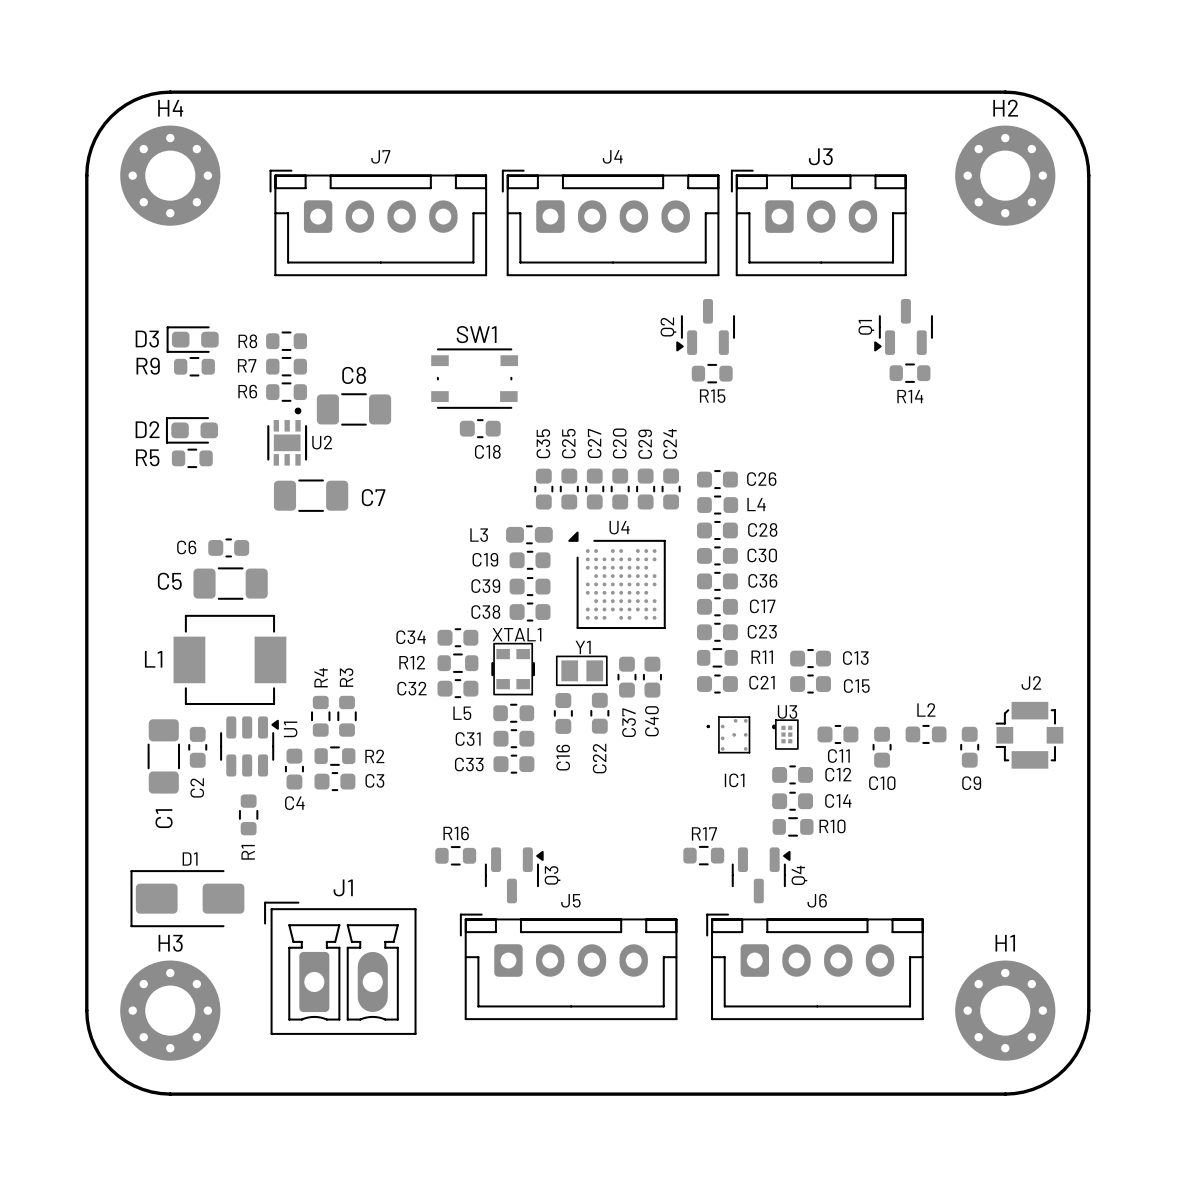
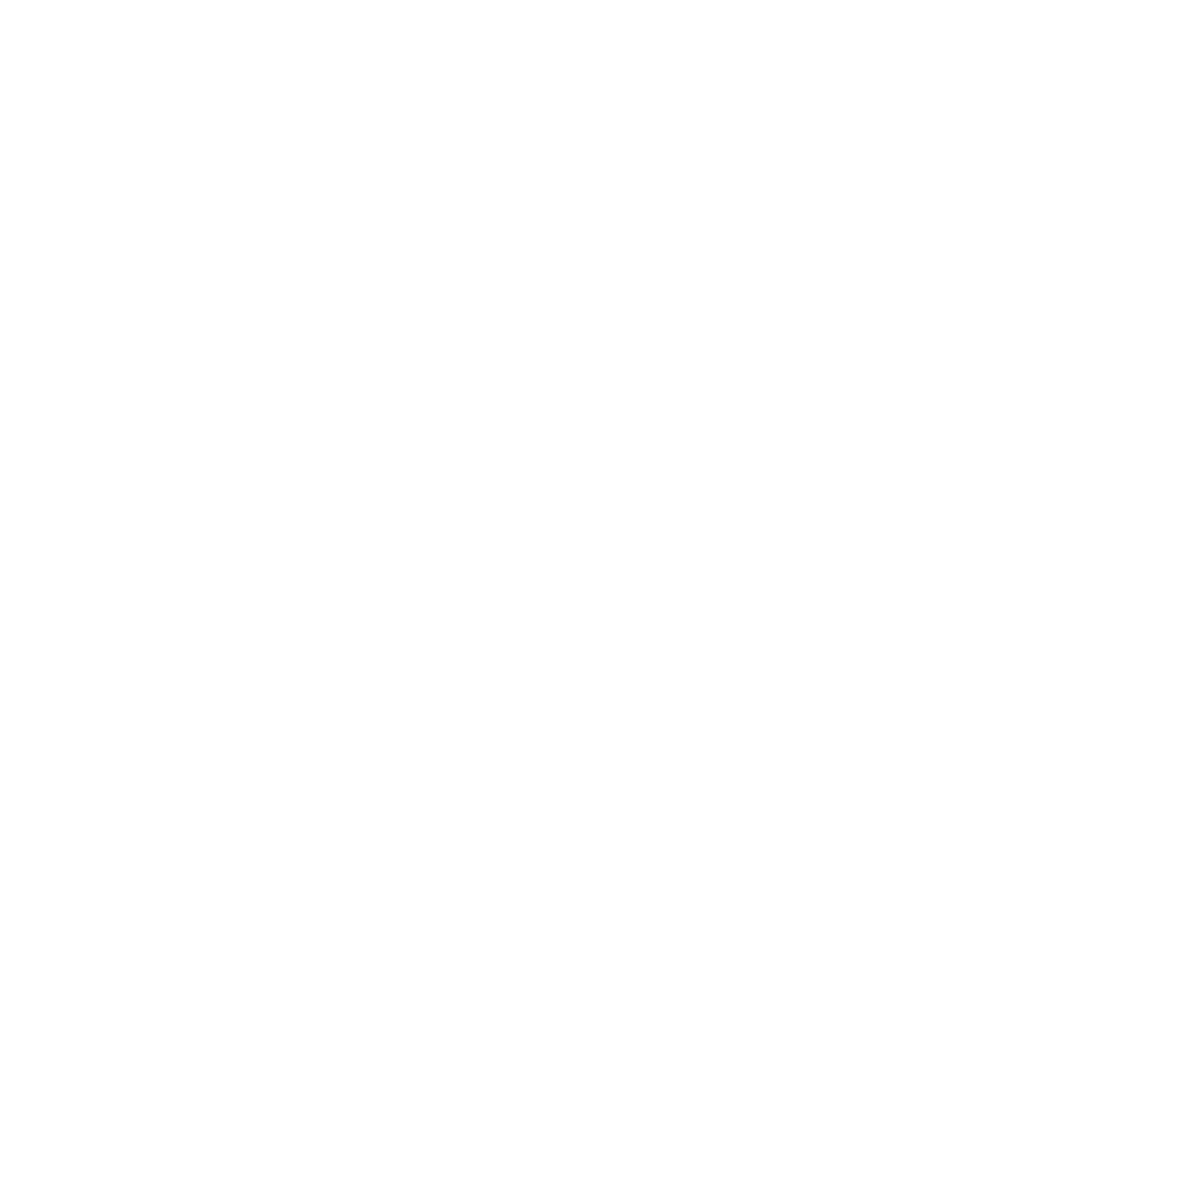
board edge: (170, 92) (1005, 92) (1023, 94) (1041, 100) (1064, 116) (1080, 139) (1086, 157) (1088, 175) (1088, 1010) (1084, 1038) (1075, 1055) (1064, 1069) (1049, 1081) (1032, 1089) (1005, 1094) (170, 1094) (151, 1092) (134, 1085) (111, 1069) (95, 1046) (88, 1029) (86, 1010) (87, 166) (91, 148) (99, 131) (118, 110) (142, 96) (170, 92) -> none
H4: (170, 175) -> none
H2: (1005, 175) -> none
J7: (378, 222) -> none
J4: (610, 222) -> none
J3: (818, 222) -> none
Q2: (705, 326) -> none
Q1: (903, 326) -> none
D3: (192, 339) -> none
R8: (286, 341) -> none
R9: (194, 366) -> none
R7: (286, 366) -> none
R15: (712, 373) -> none
R14: (910, 373) -> none
SW1: (474, 378) -> none
R6: (286, 392) -> none
C8: (353, 409) -> none
C18: (480, 428) -> none
D2: (191, 430) -> none
U2: (287, 436) -> none
R5: (192, 458) -> none
C26: (717, 479) -> none
C35: (543, 489) -> none
C25: (569, 489) -> none
C27: (594, 489) -> none
C20: (620, 489) -> none
C29: (645, 489) -> none
C24: (671, 489) -> none
C7: (311, 495) -> none
L4: (717, 505) -> none
C28: (717, 530) -> none
L3: (529, 534) -> none
C6: (228, 547) -> none
C30: (717, 555) -> none
C19: (530, 560) -> none
U4: (617, 580) -> none
C36: (717, 581) -> none
C5: (230, 583) -> none
C39: (530, 586) -> none
C17: (717, 606) -> none
C38: (530, 612) -> none
C23: (717, 632) -> none
C34: (457, 637) -> none
R11: (717, 657) -> none
C13: (810, 658) -> none
L1: (229, 659) -> none
R12: (457, 663) -> none
XTAL1: (513, 669) -> none
Y1: (581, 670) -> none
C37: (626, 677) -> none
C40: (652, 677) -> none
C21: (717, 684) -> none
C15: (810, 684) -> none
C32: (457, 688) -> none
L5: (513, 713) -> none
C16: (563, 713) -> none
C22: (599, 713) -> none
R4: (320, 716) -> none
R3: (347, 716) -> none
IC1: (728, 734) -> none
U3: (785, 734) -> none
C11: (837, 734) -> none
L2: (926, 734) -> none
J2: (1029, 735) -> none
C31: (513, 738) -> none
U1: (249, 746) -> none
C2: (197, 747) -> none
C10: (882, 747) -> none
C9: (969, 747) -> none
C1: (163, 756) -> none
R2: (334, 756) -> none
C33: (513, 764) -> none
C4: (294, 769) -> none
C12: (792, 774) -> none
C3: (334, 781) -> none
C14: (792, 801) -> none
R1: (248, 814) -> none
R10: (793, 826) -> none
R16: (455, 855) -> none
R17: (703, 855) -> none
Q3: (514, 875) -> none
Q4: (761, 875) -> none
D1: (187, 898) -> none
J5: (568, 966) -> none
J6: (814, 966) -> none
J1: (340, 968) -> none
H3: (170, 1010) -> none
H1: (1005, 1010) -> none

